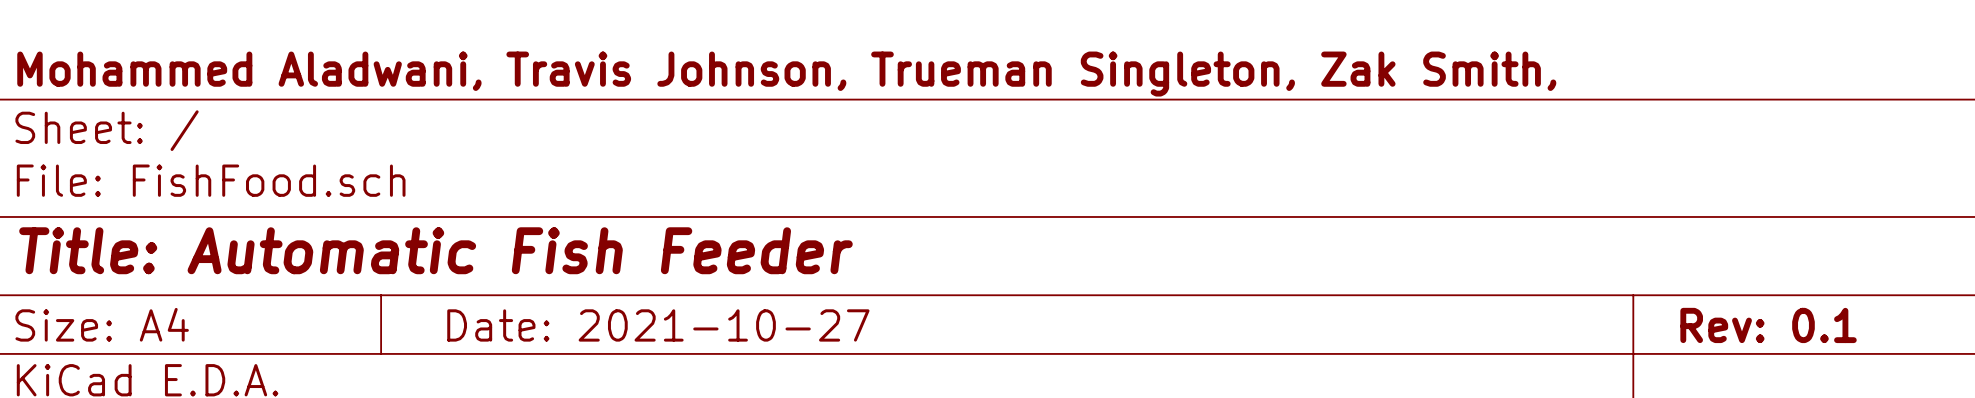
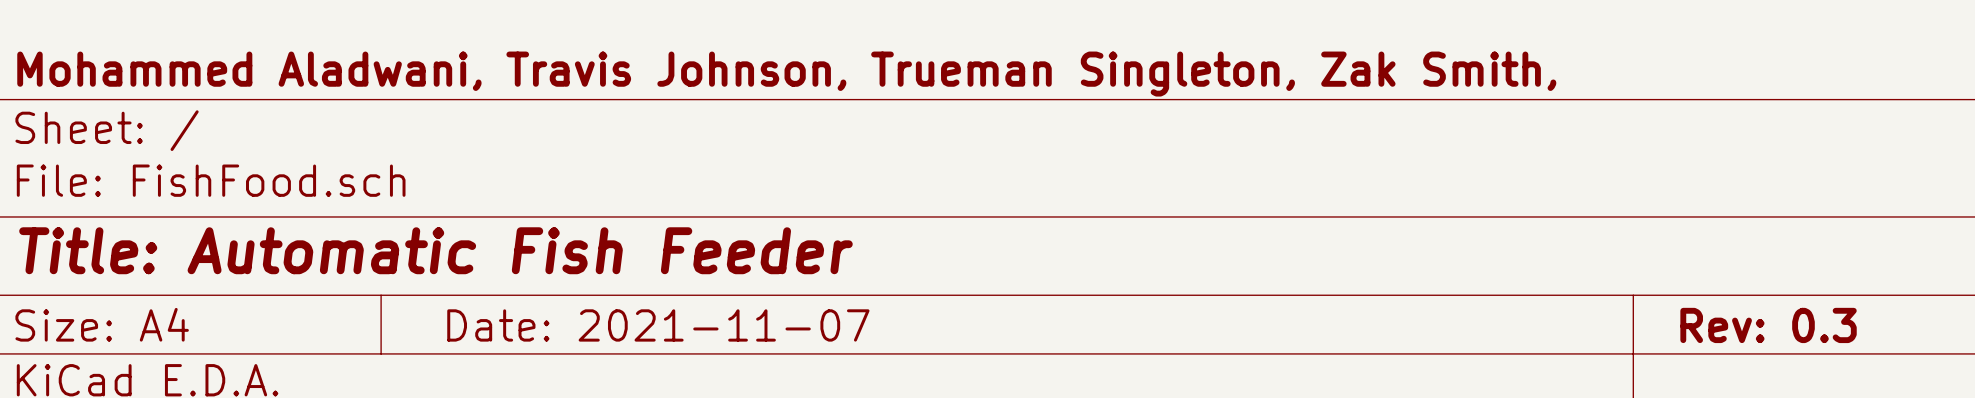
title block: Date: 2021-10-27 (658, 325) -> Date: 2021-11-07 (658, 325)
title block: Rev: 0.1 (1768, 325) -> Rev: 0.3 (1768, 325)

